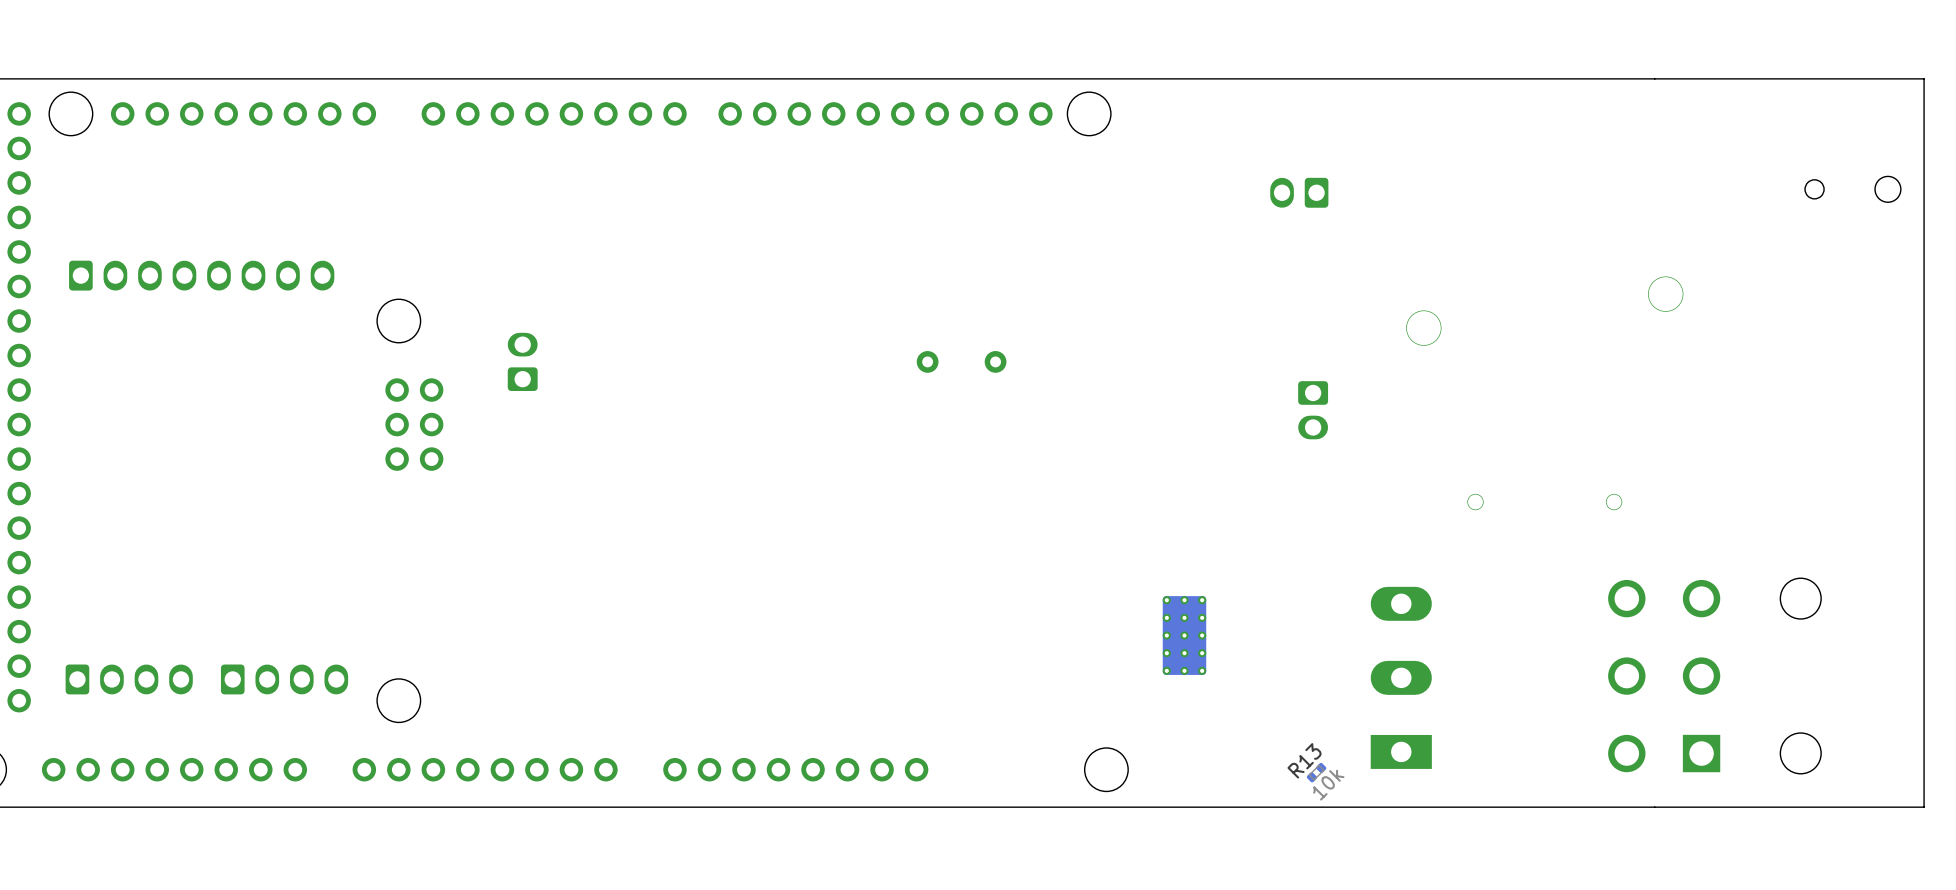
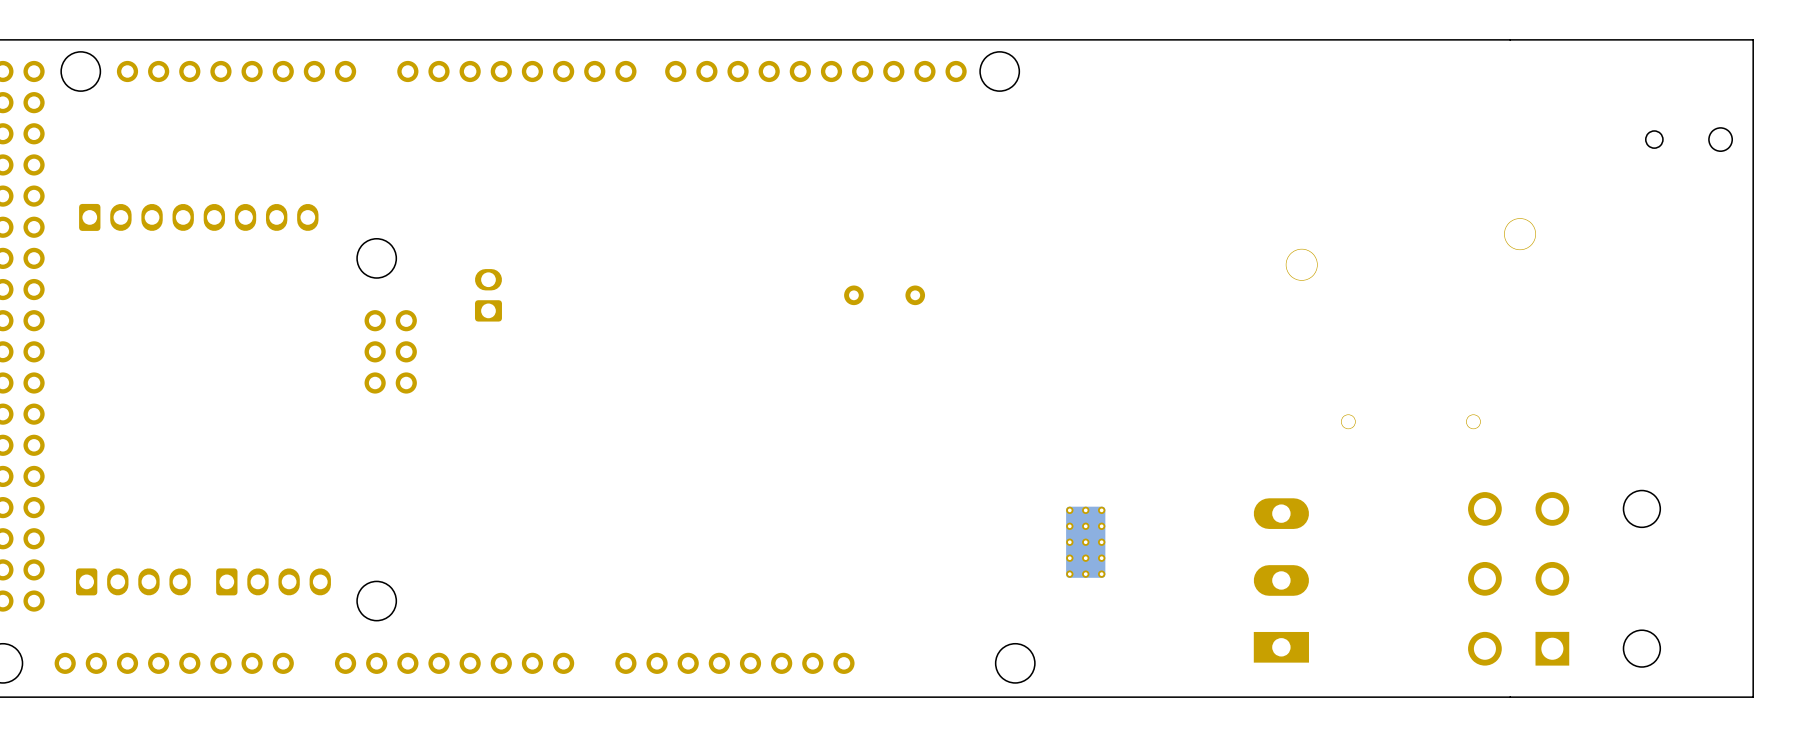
part: (1299, 192) -> none
part: (1313, 410) -> none
R13: 10k (1316, 772) -> none

